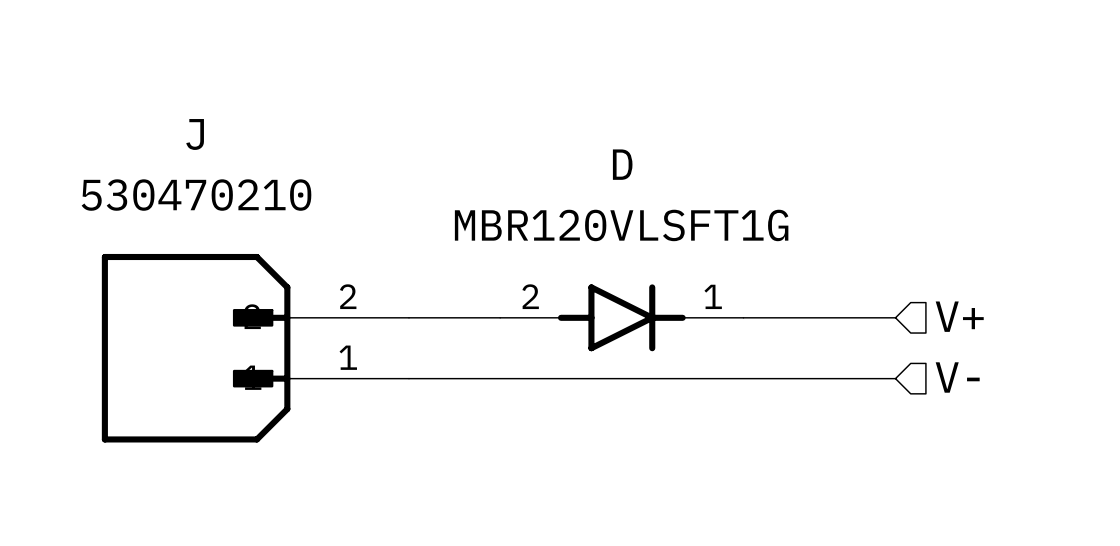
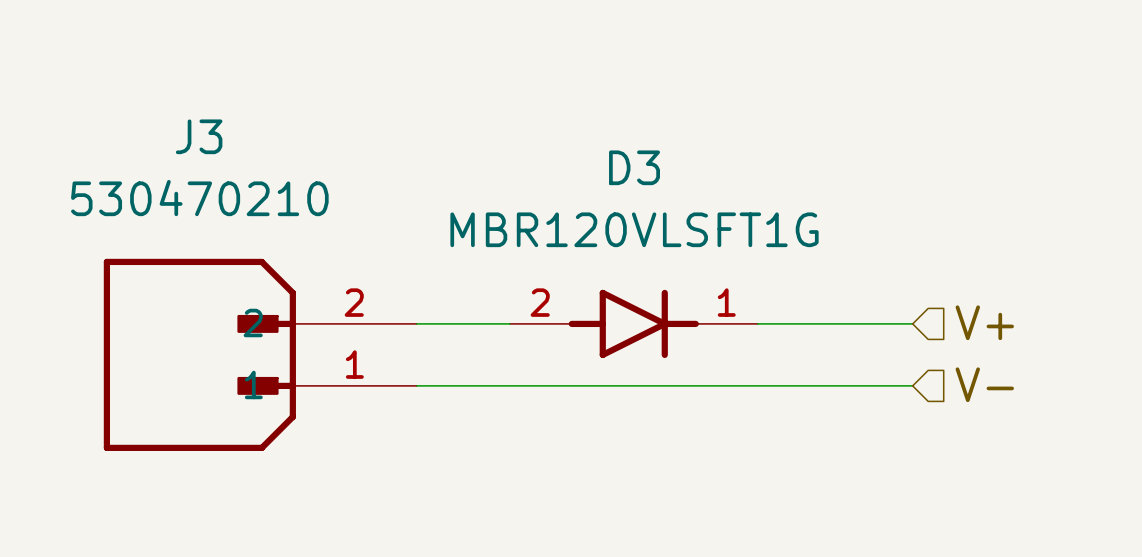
J name: J (195, 134) -> J3 (199, 136)
D name: D (622, 164) -> D3 (634, 167)

